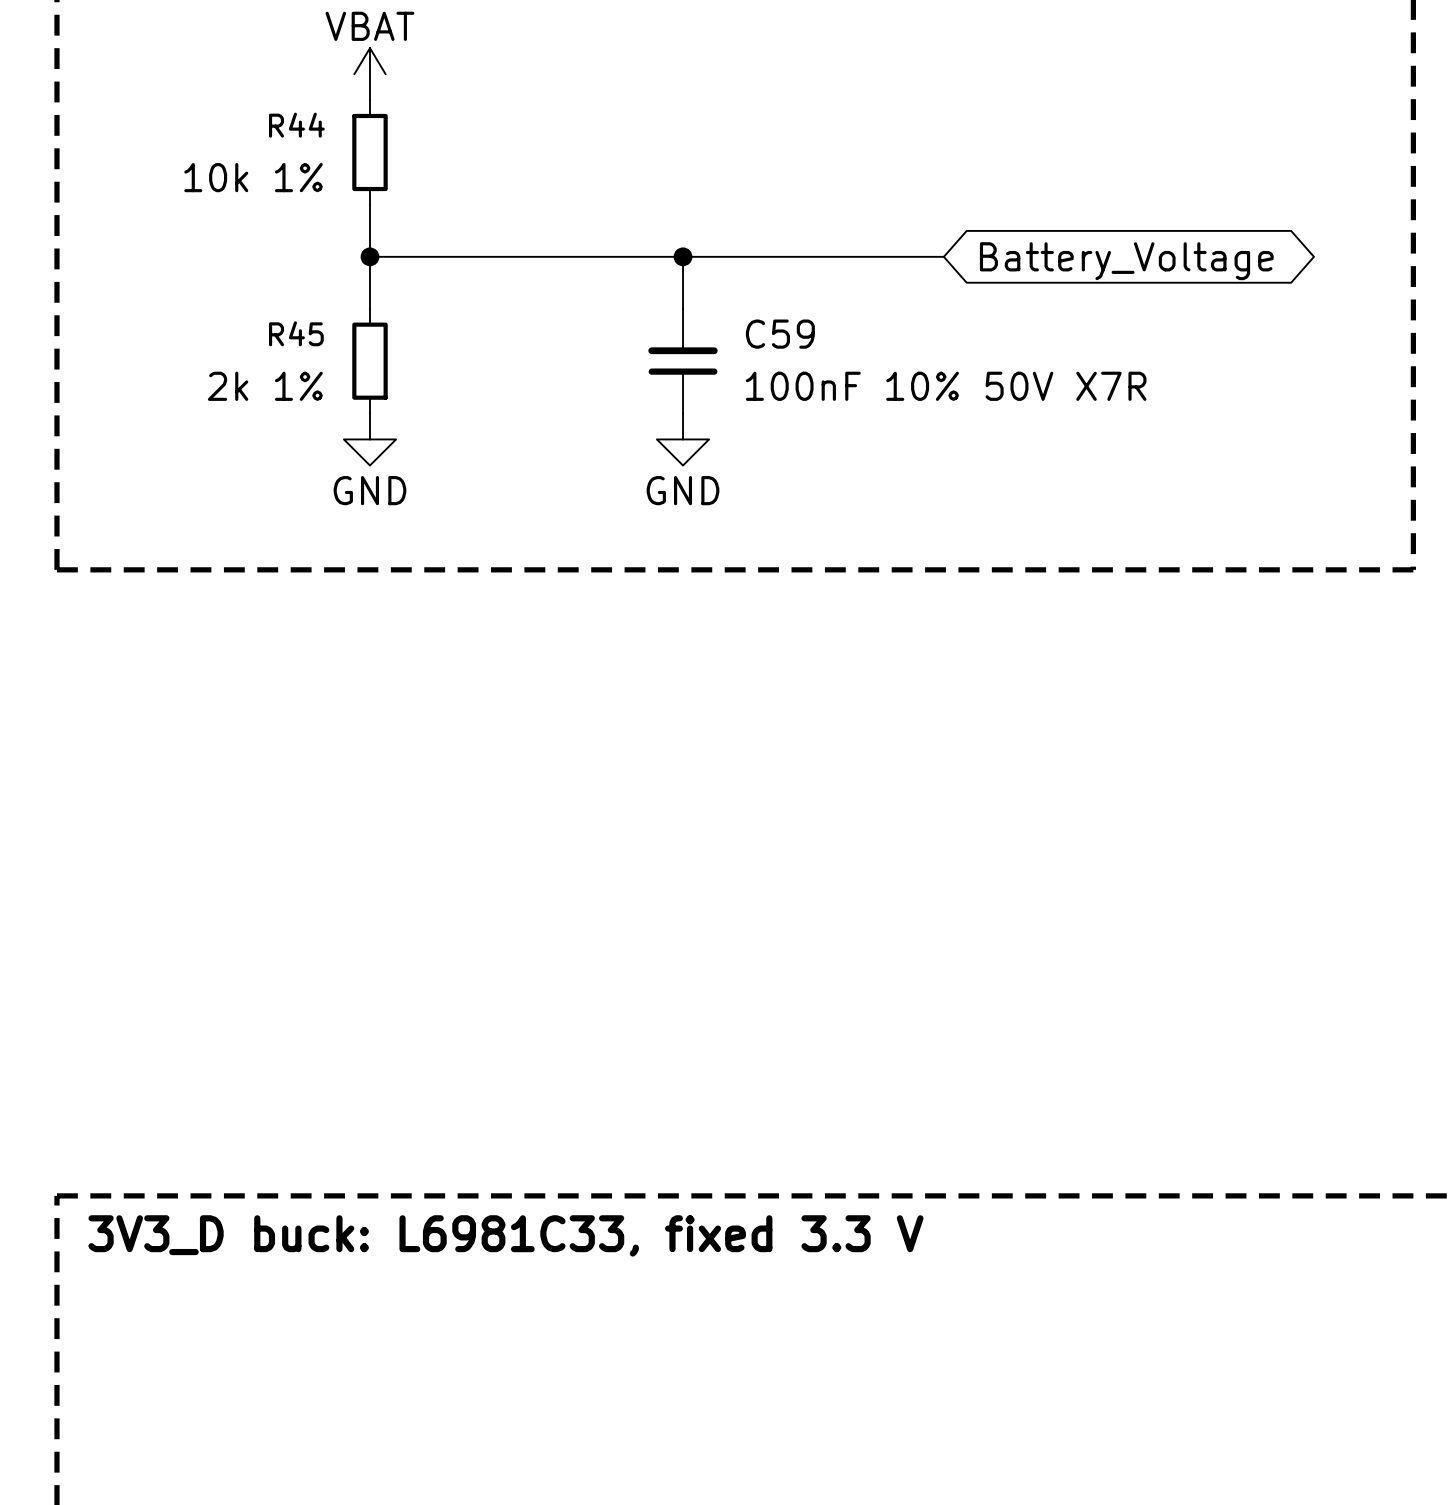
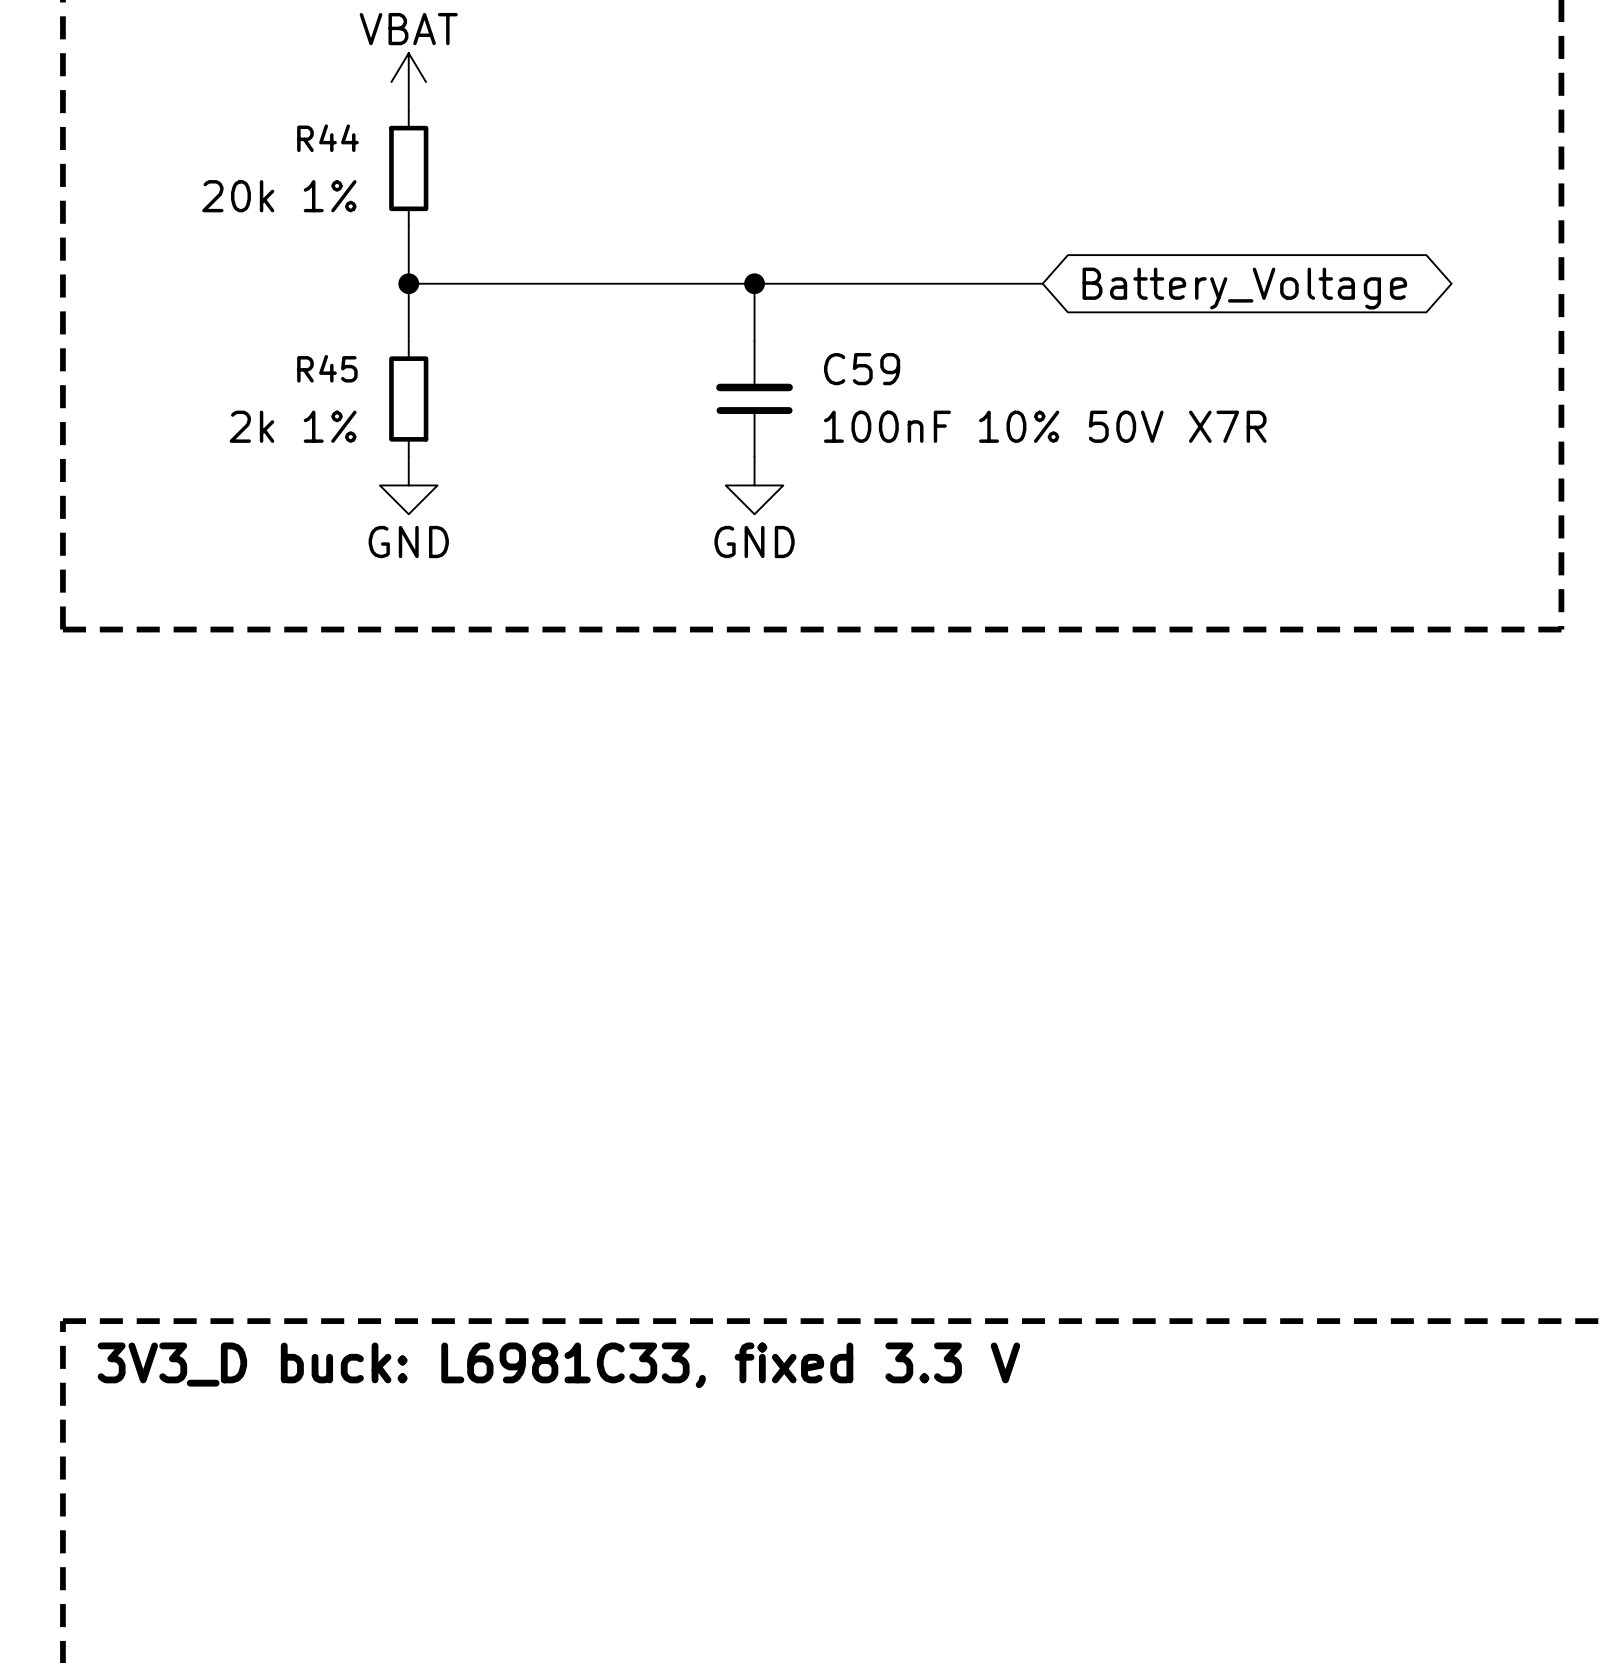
R44 value: 10k 1% (253, 177) -> 20k 1% (279, 196)

